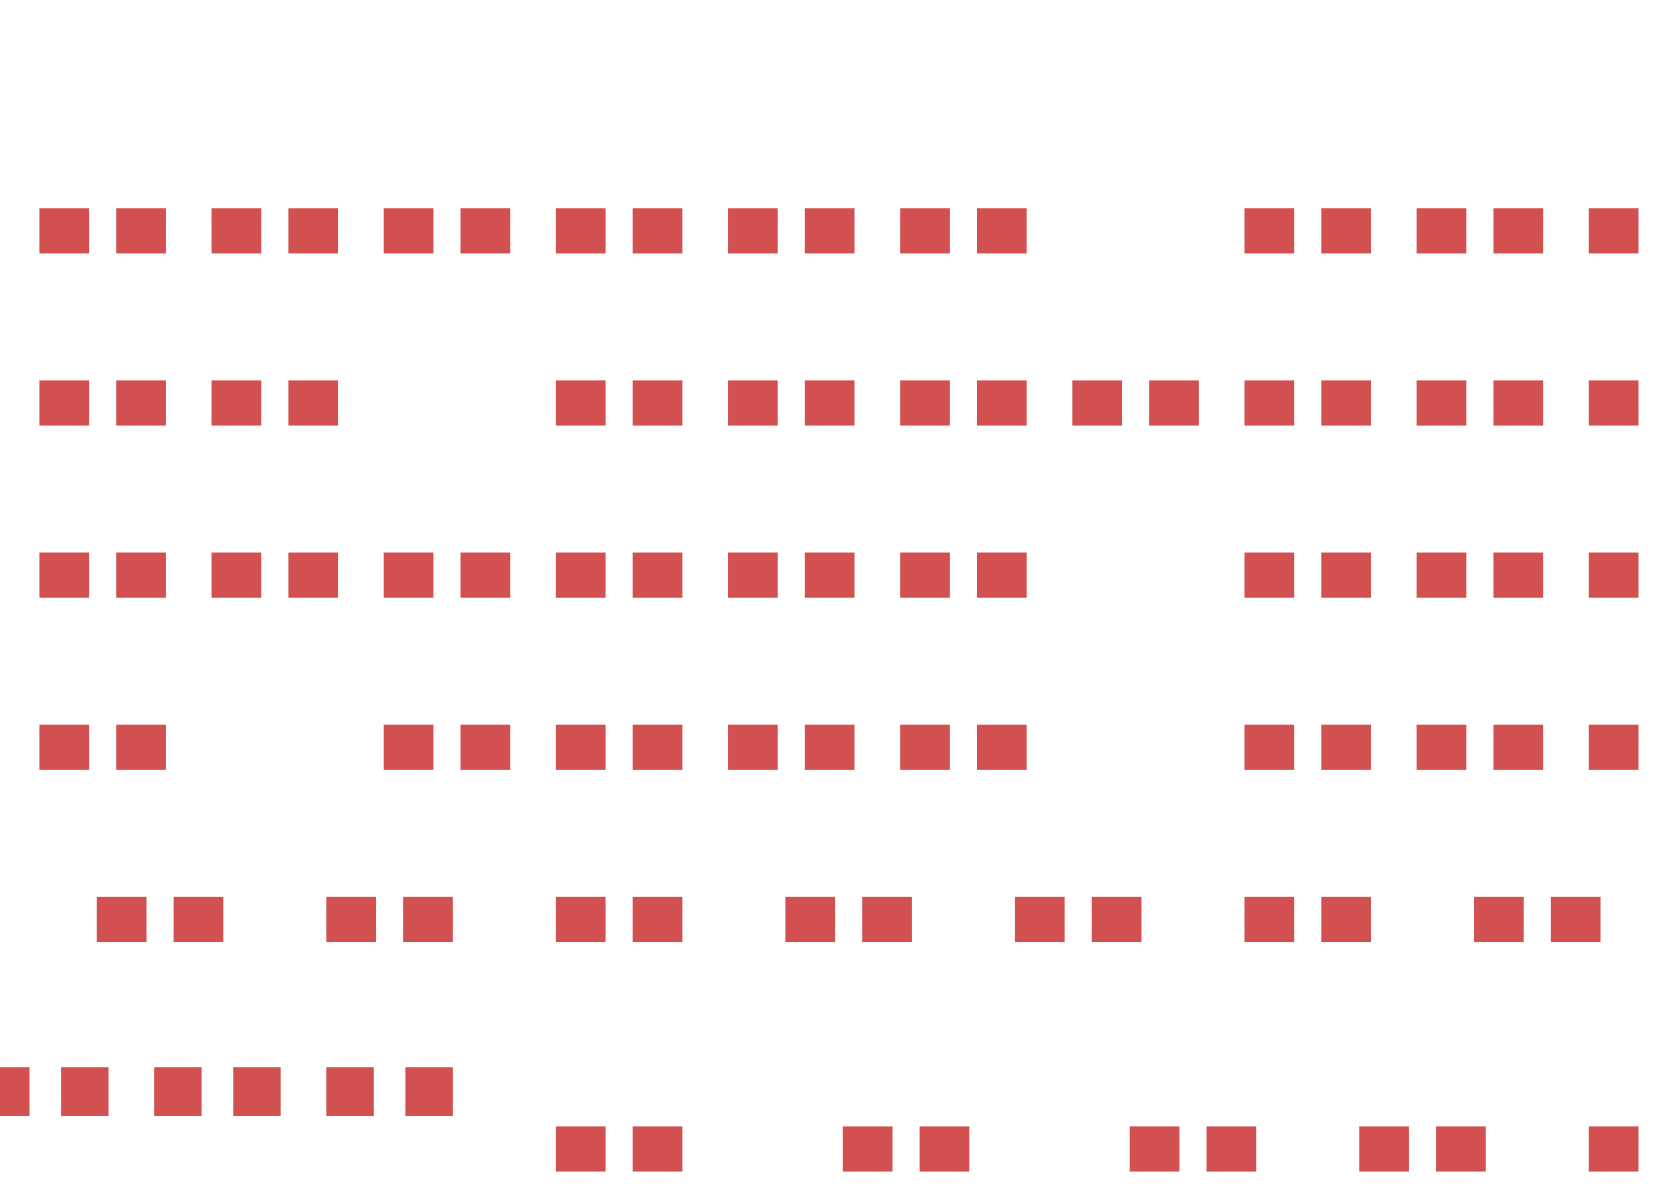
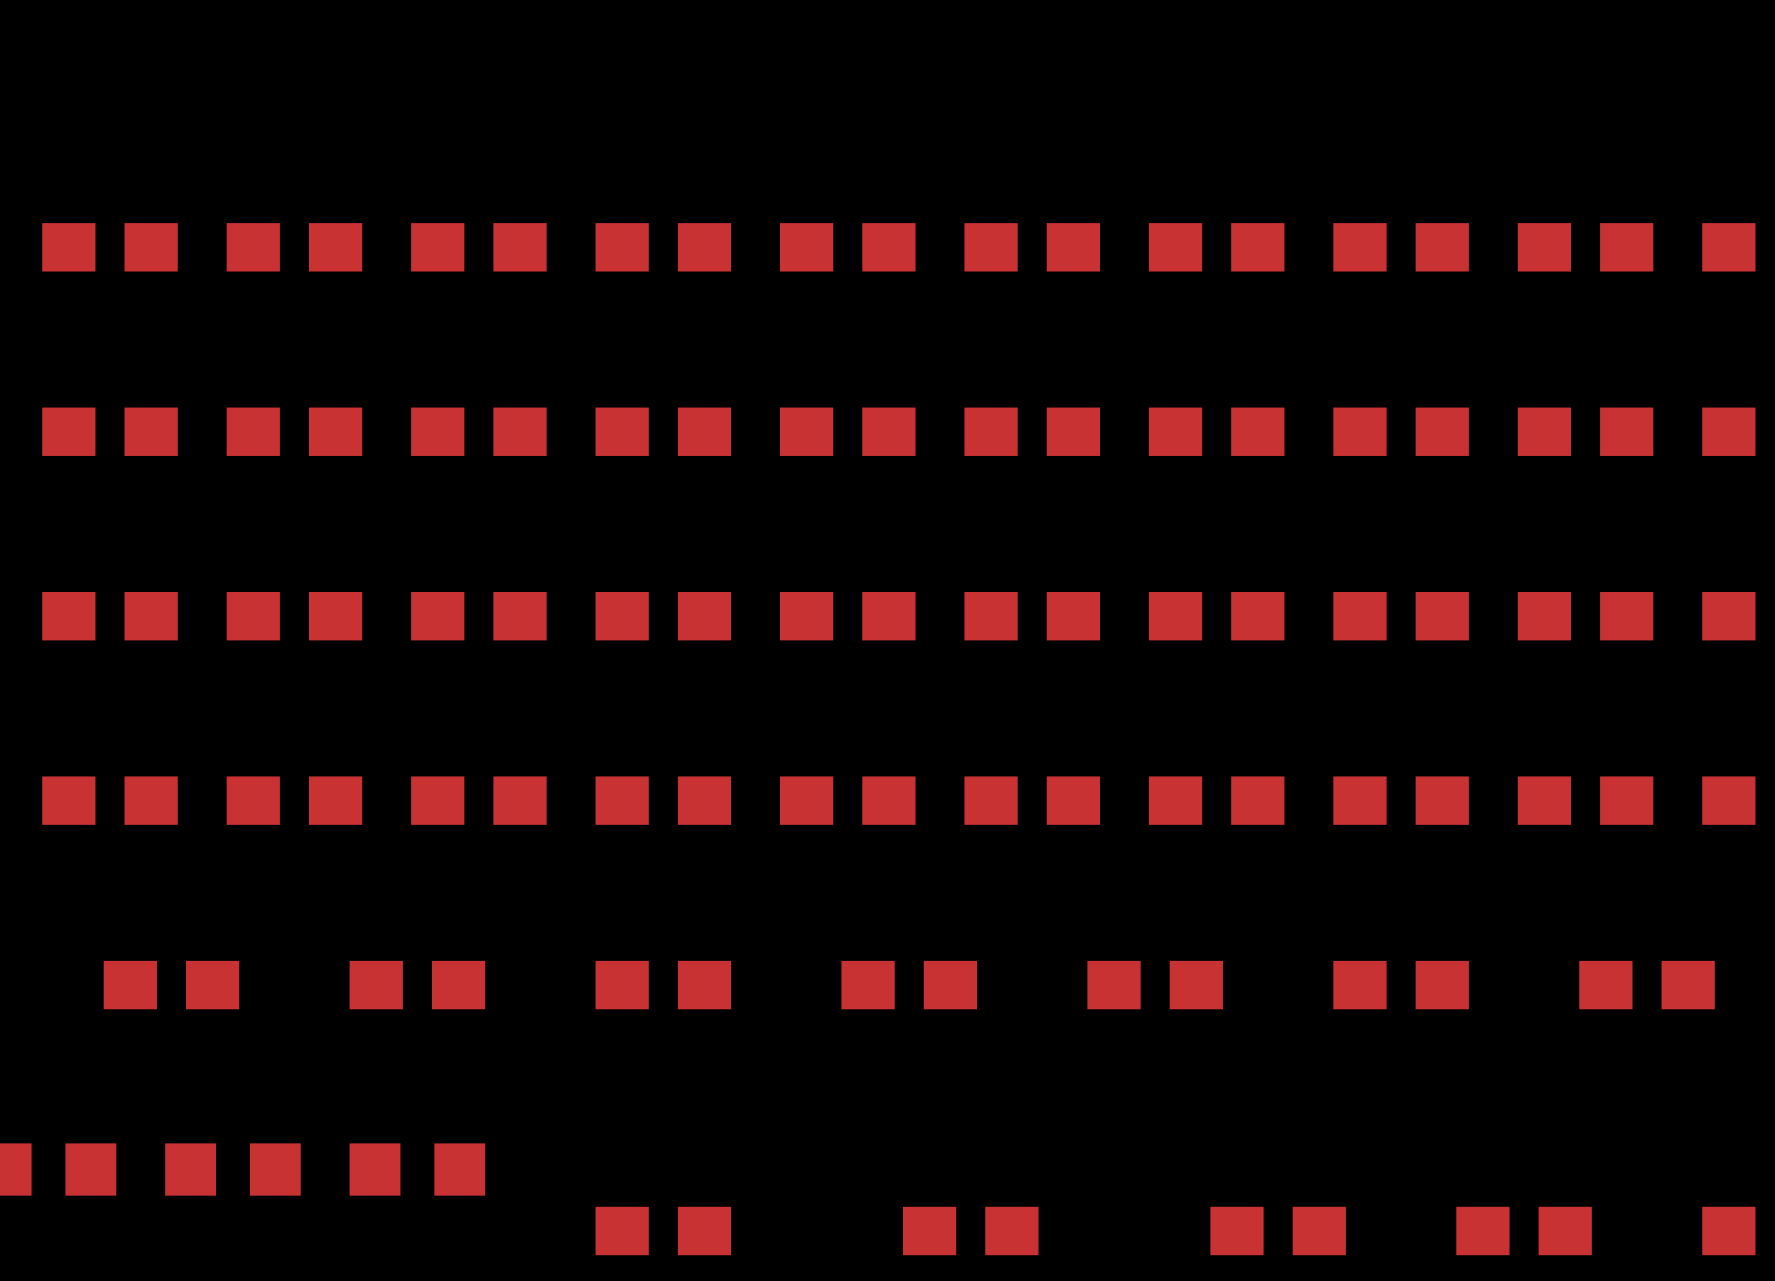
part: none -> (1216, 247)
part: none -> (478, 431)
part: none -> (1216, 616)
part: none -> (294, 800)
part: none -> (1216, 800)

